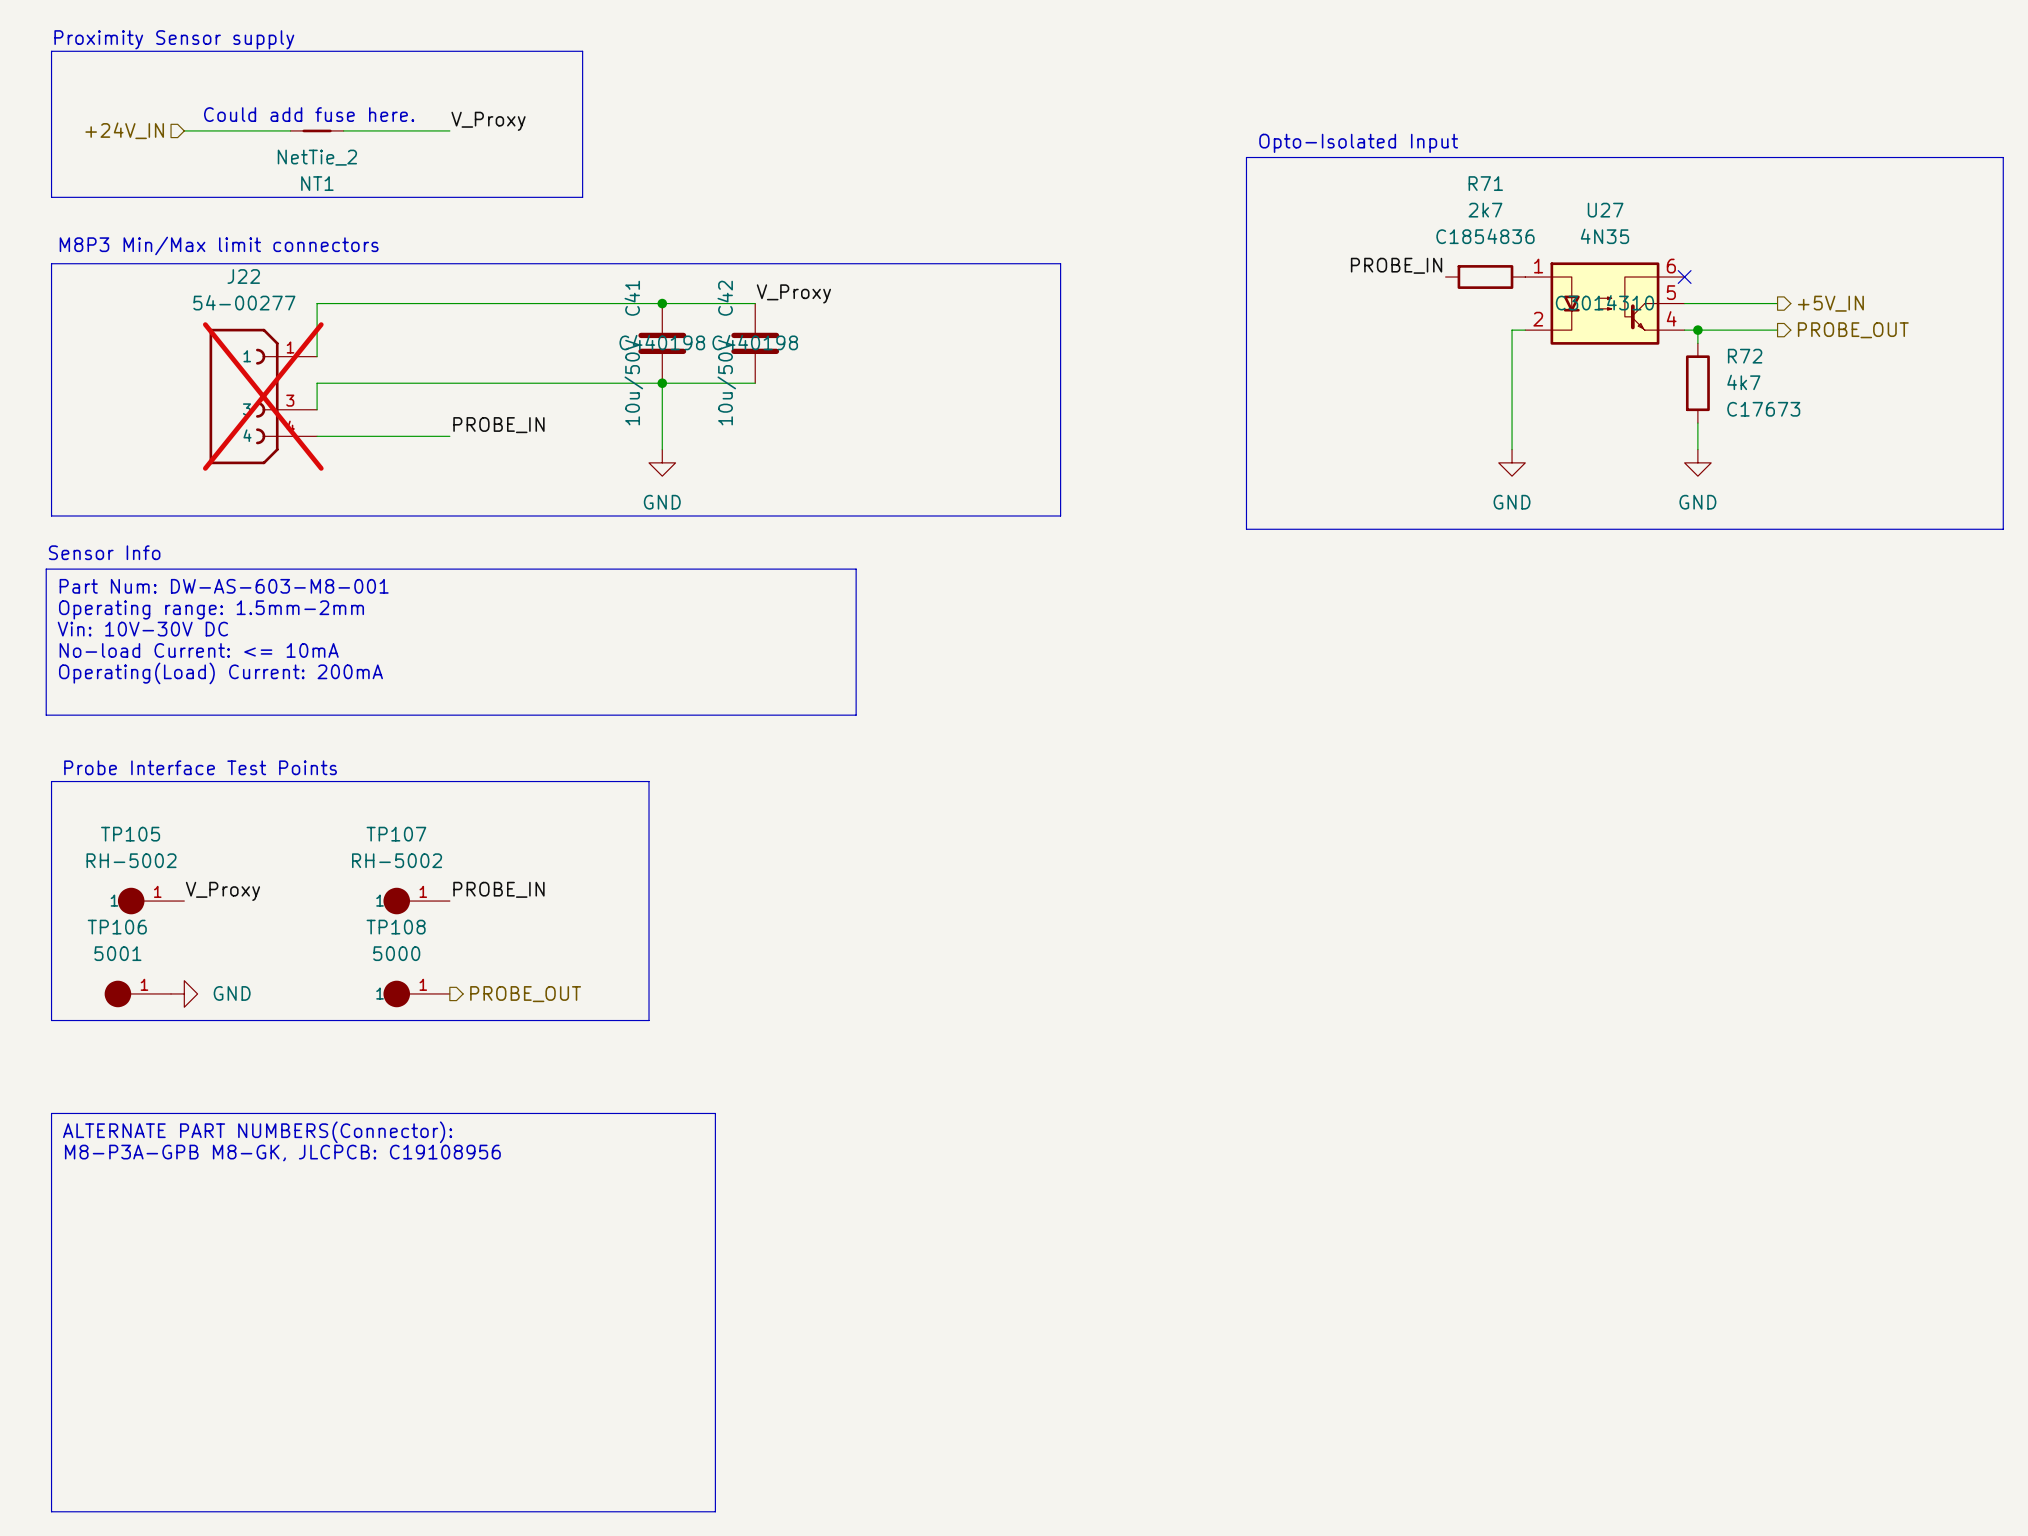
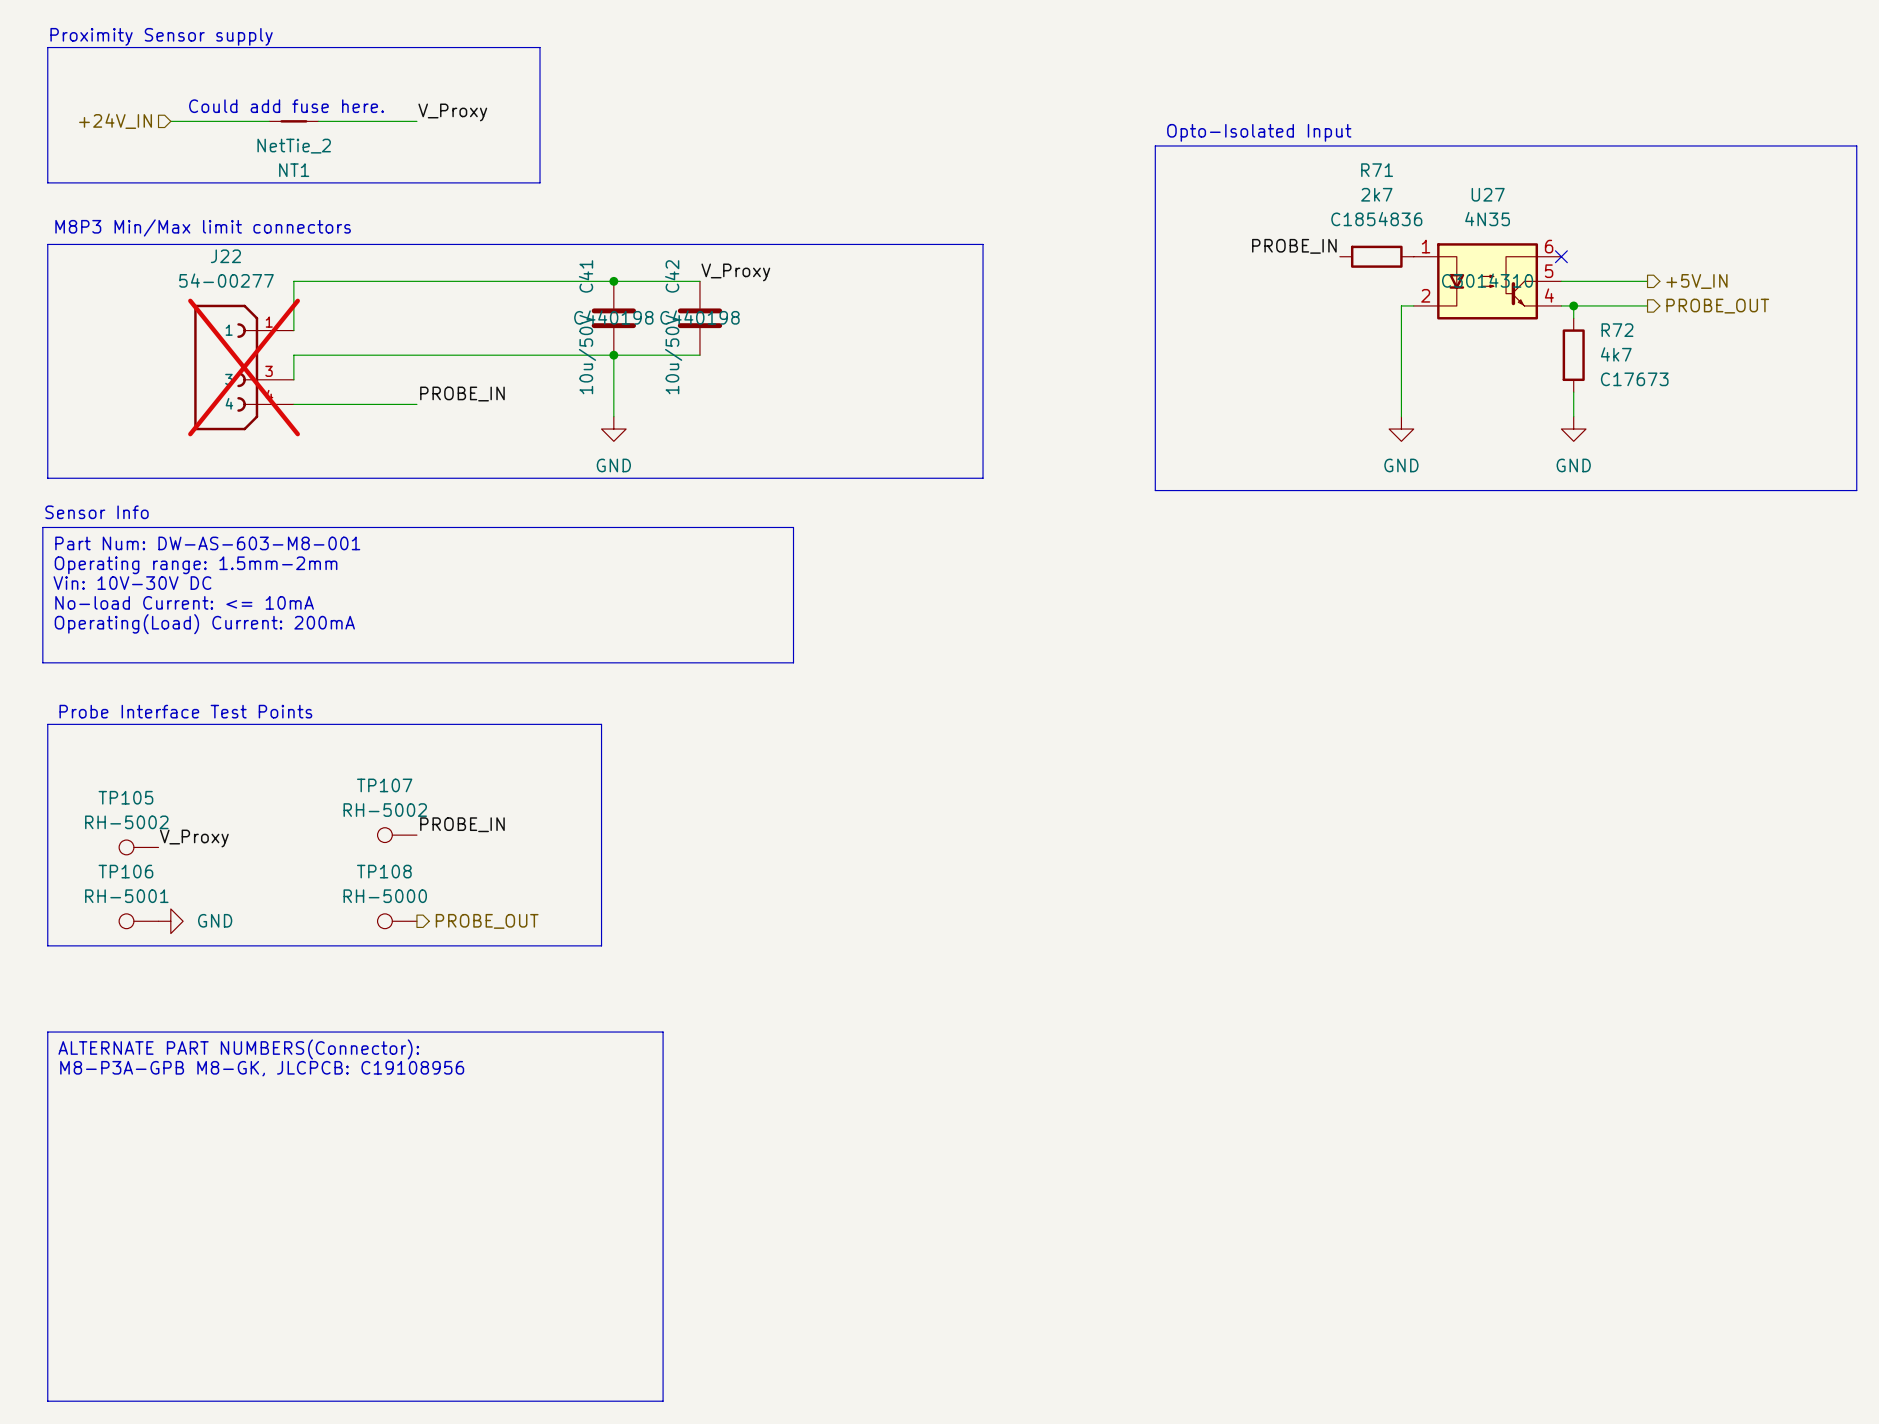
TP105 symbol: [117, 887, 185, 915] -> [119, 840, 159, 855]
TP107 symbol: [383, 887, 450, 915] -> [377, 827, 417, 843]
label position: V_Proxy (222, 891) -> V_Proxy (194, 838)
TP106 value: 5001 (117, 953) -> RH-5001 (126, 896)
TP108 value: 5000 (396, 953) -> RH-5000 (385, 896)
TP106 symbol: [104, 980, 172, 1008] -> [119, 913, 159, 929]
TP108 symbol: [383, 980, 450, 1008] -> [377, 913, 417, 929]

